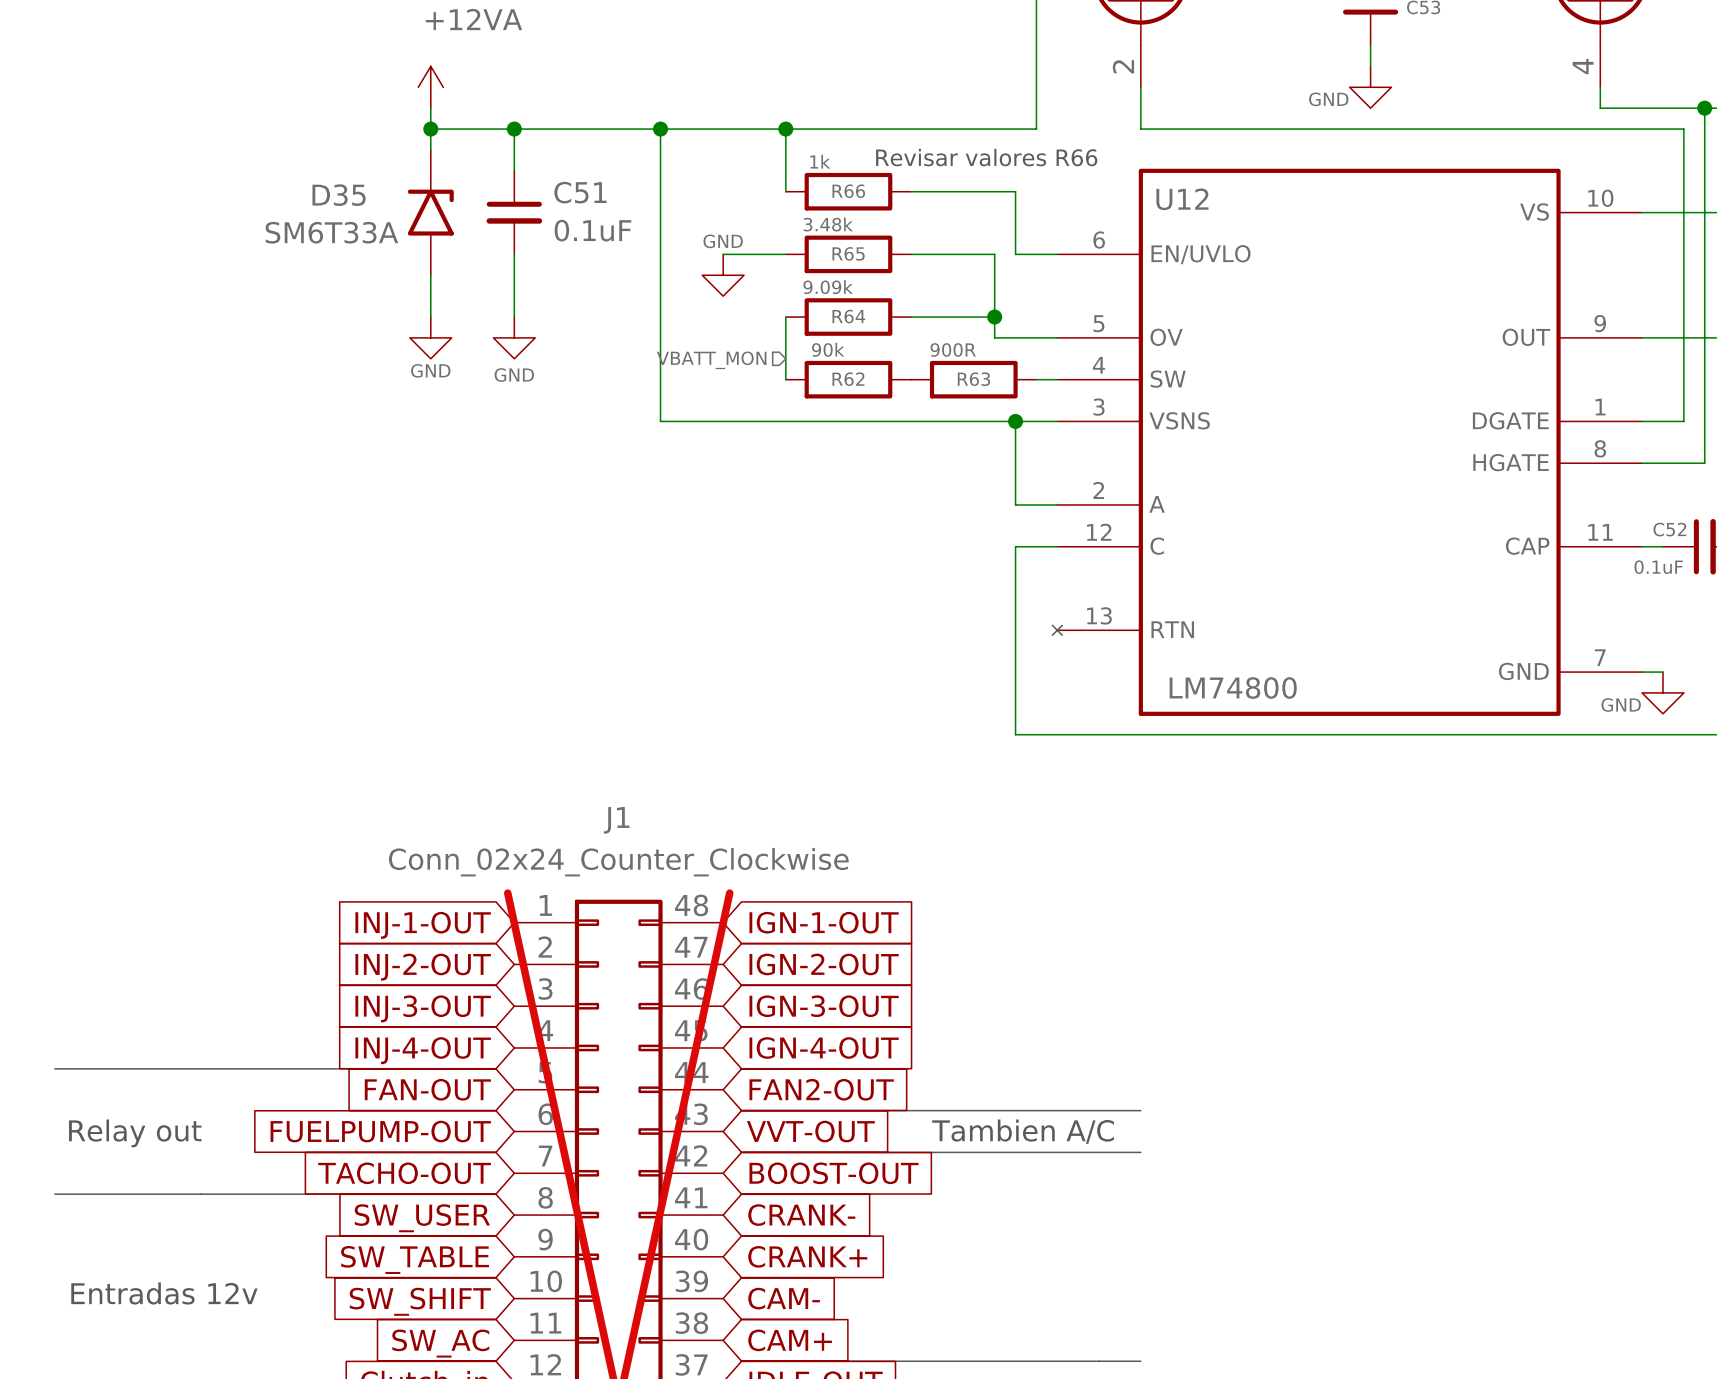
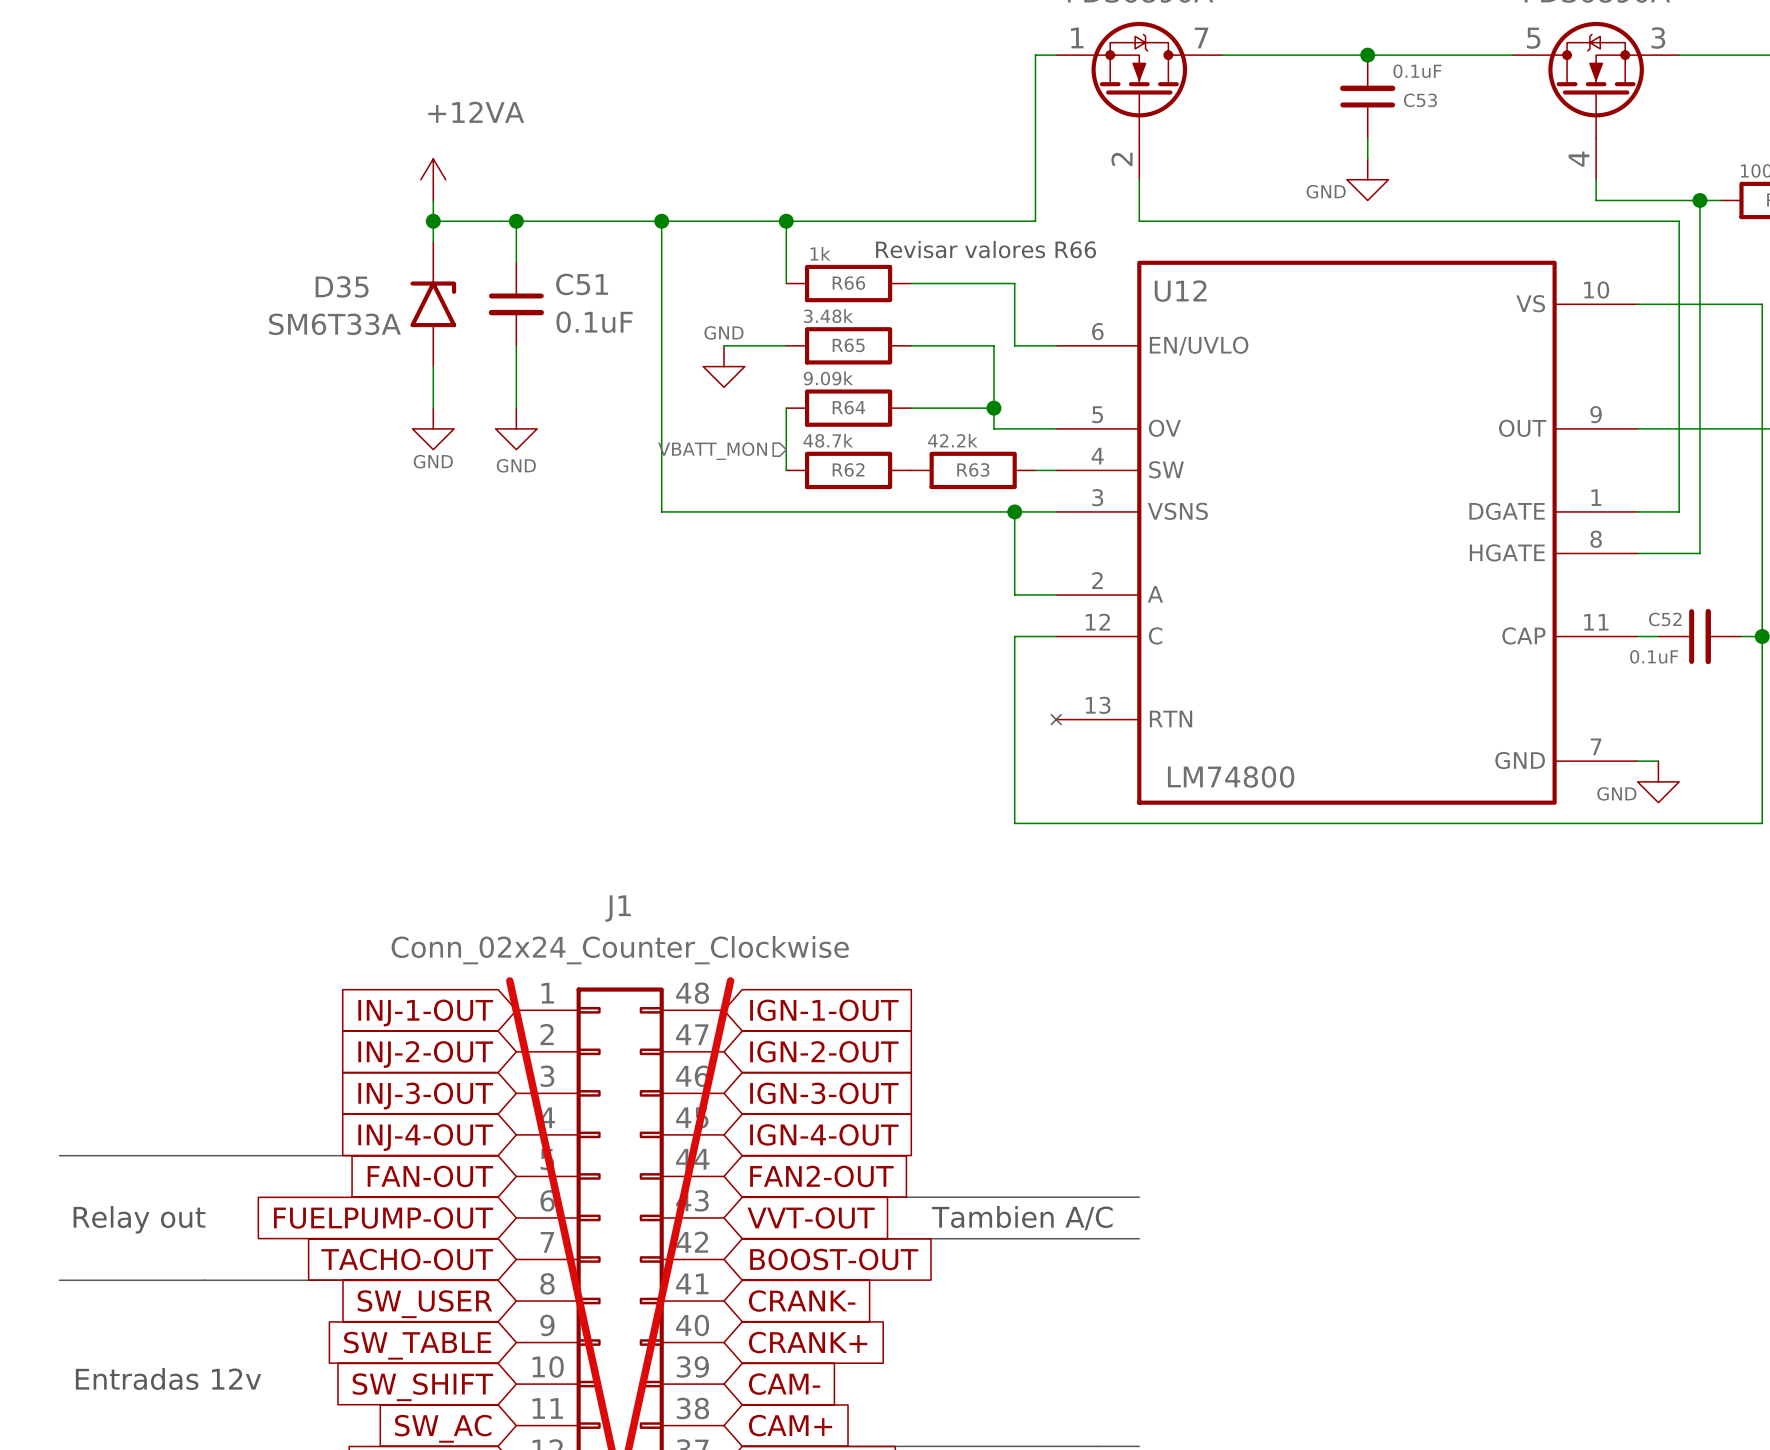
R62 value: 90k (828, 349) -> 48.7k (828, 440)
R63 value: 900R (953, 349) -> 42.2k (952, 440)

